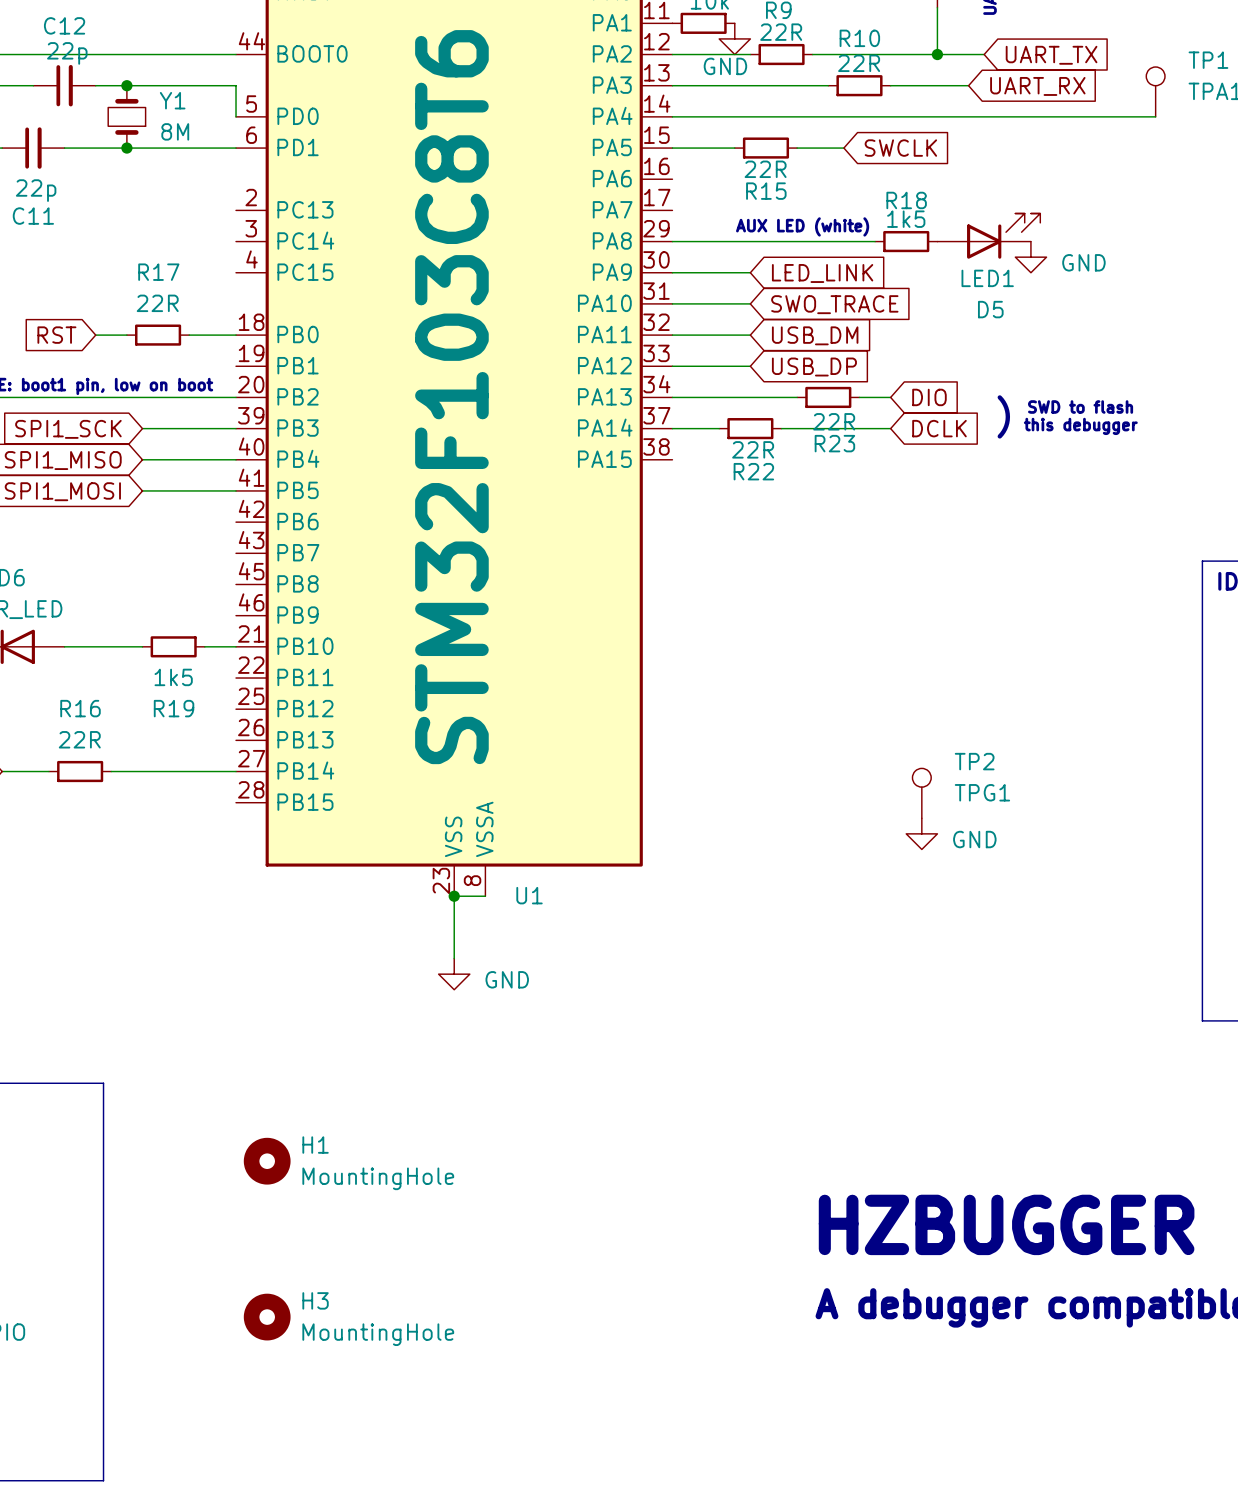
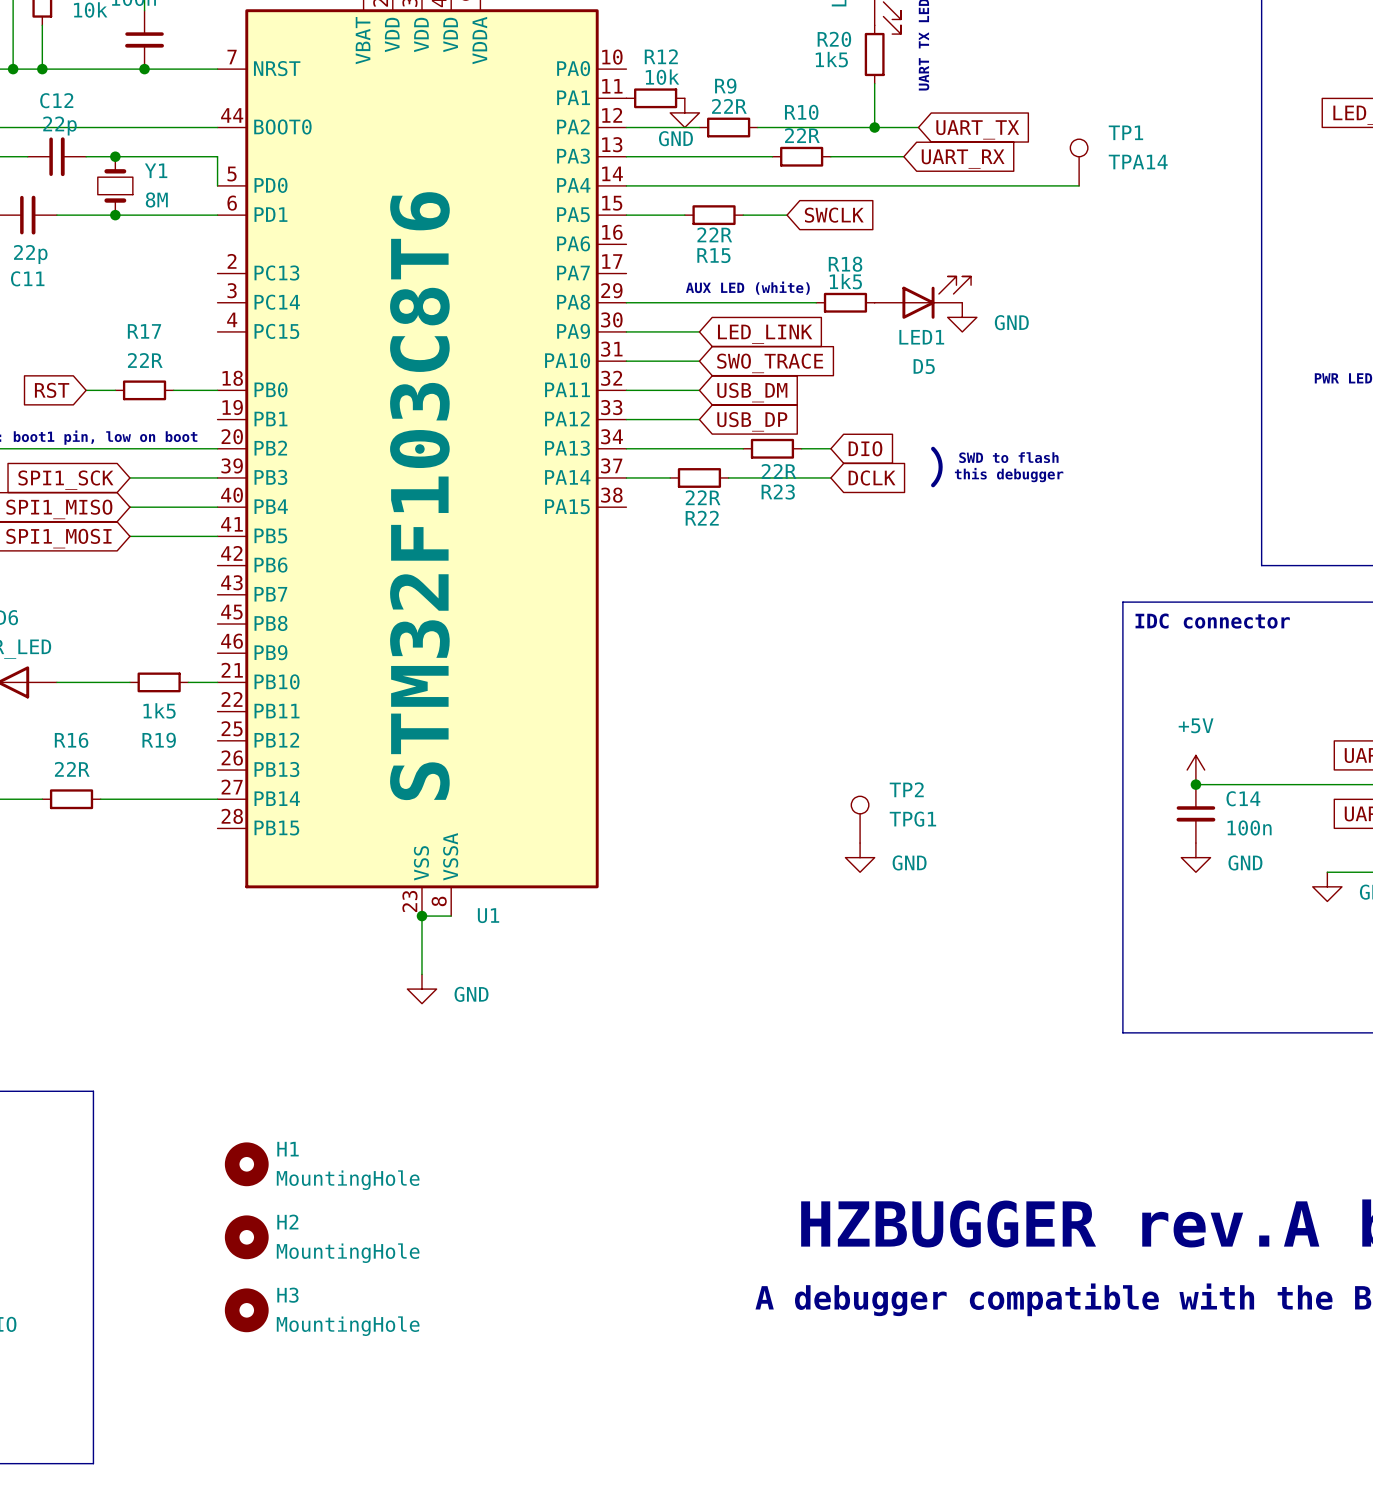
H2: none -> MountingHole (246, 1237)

